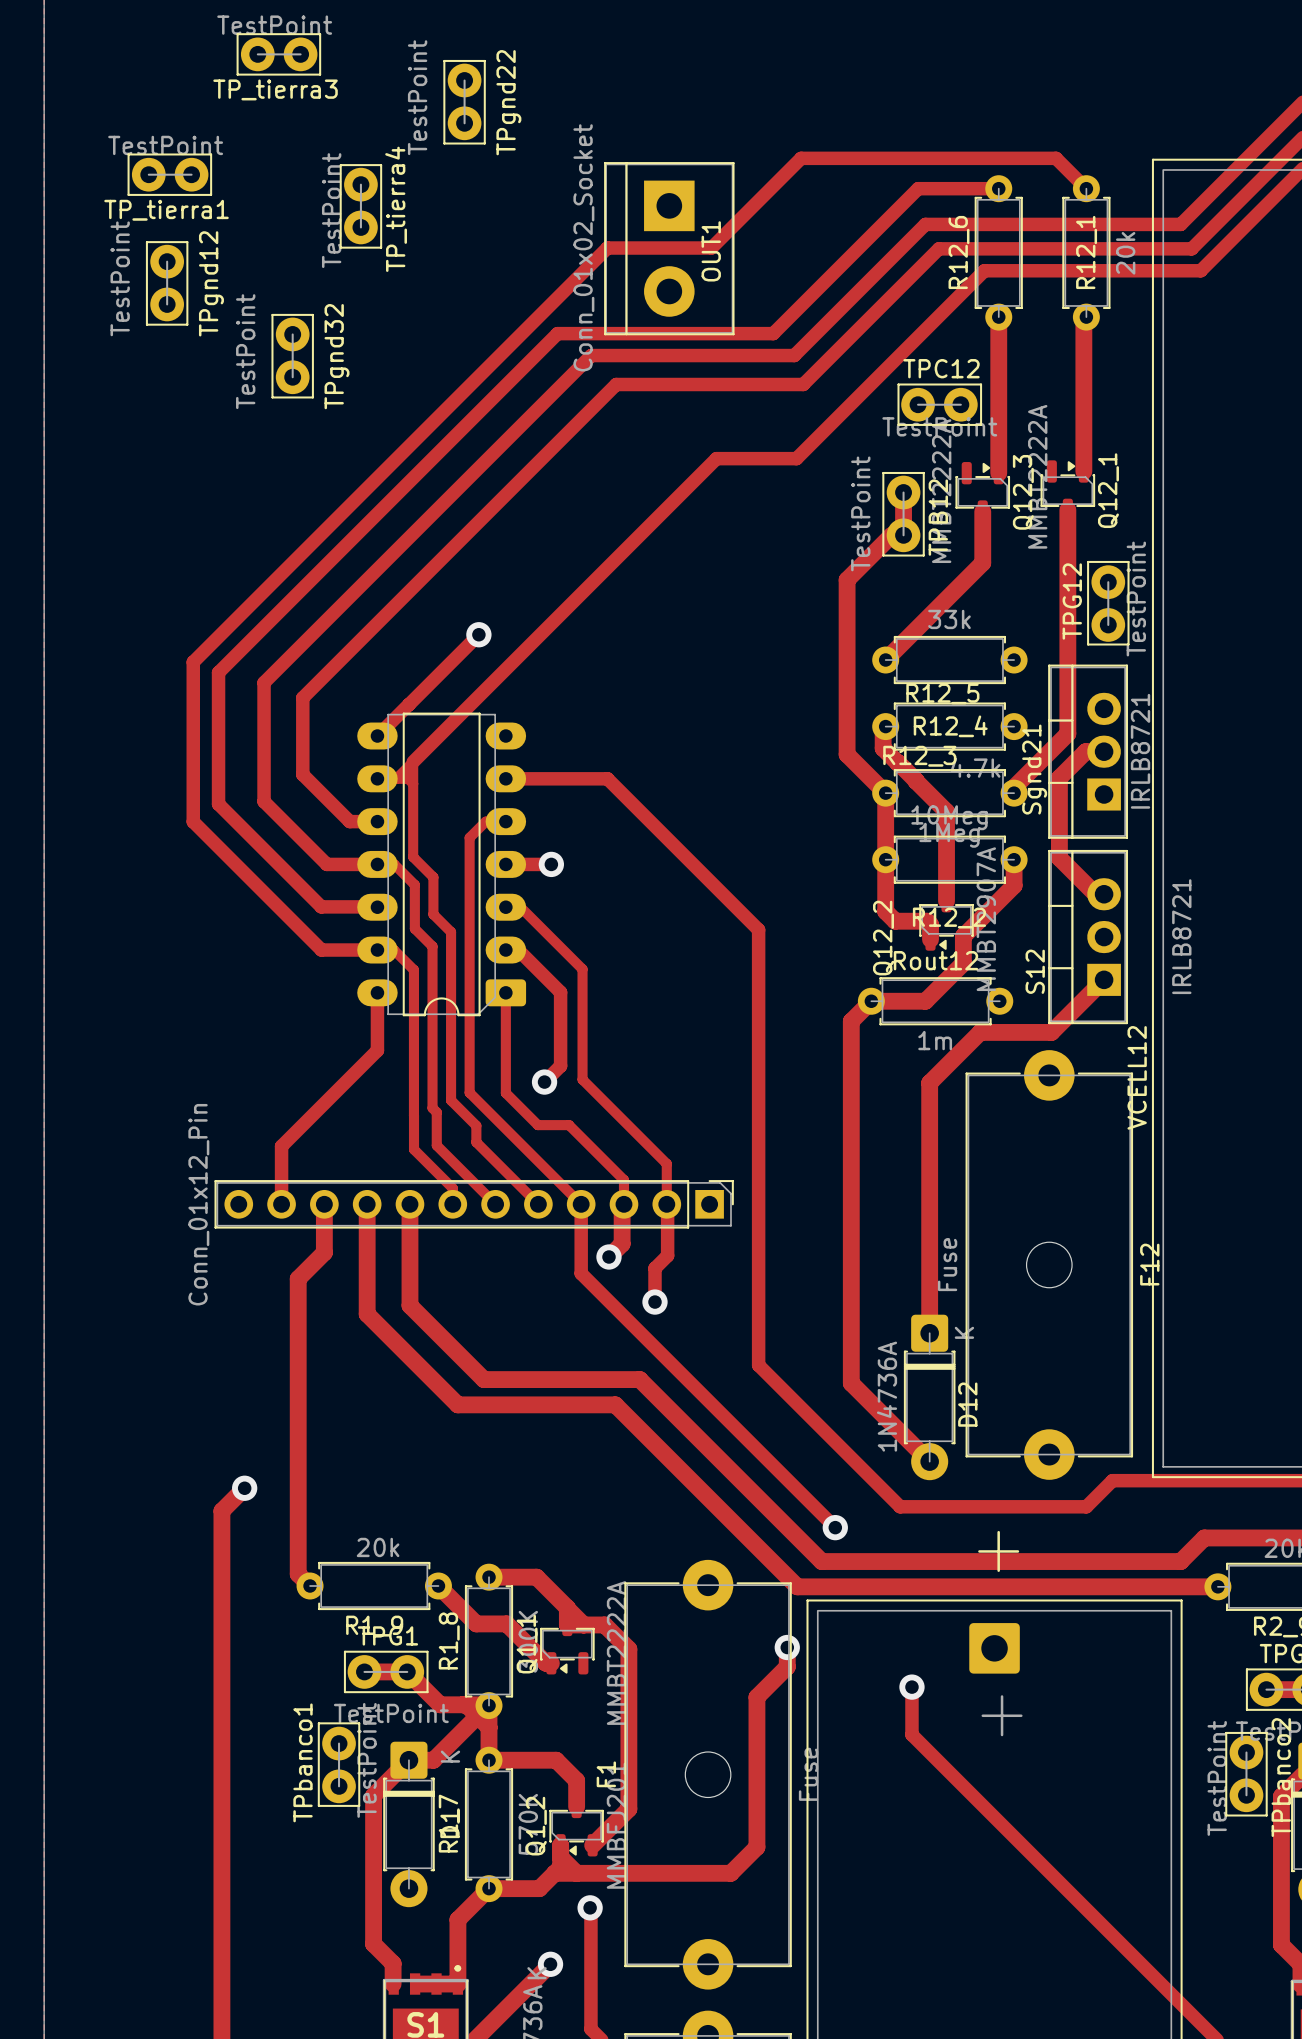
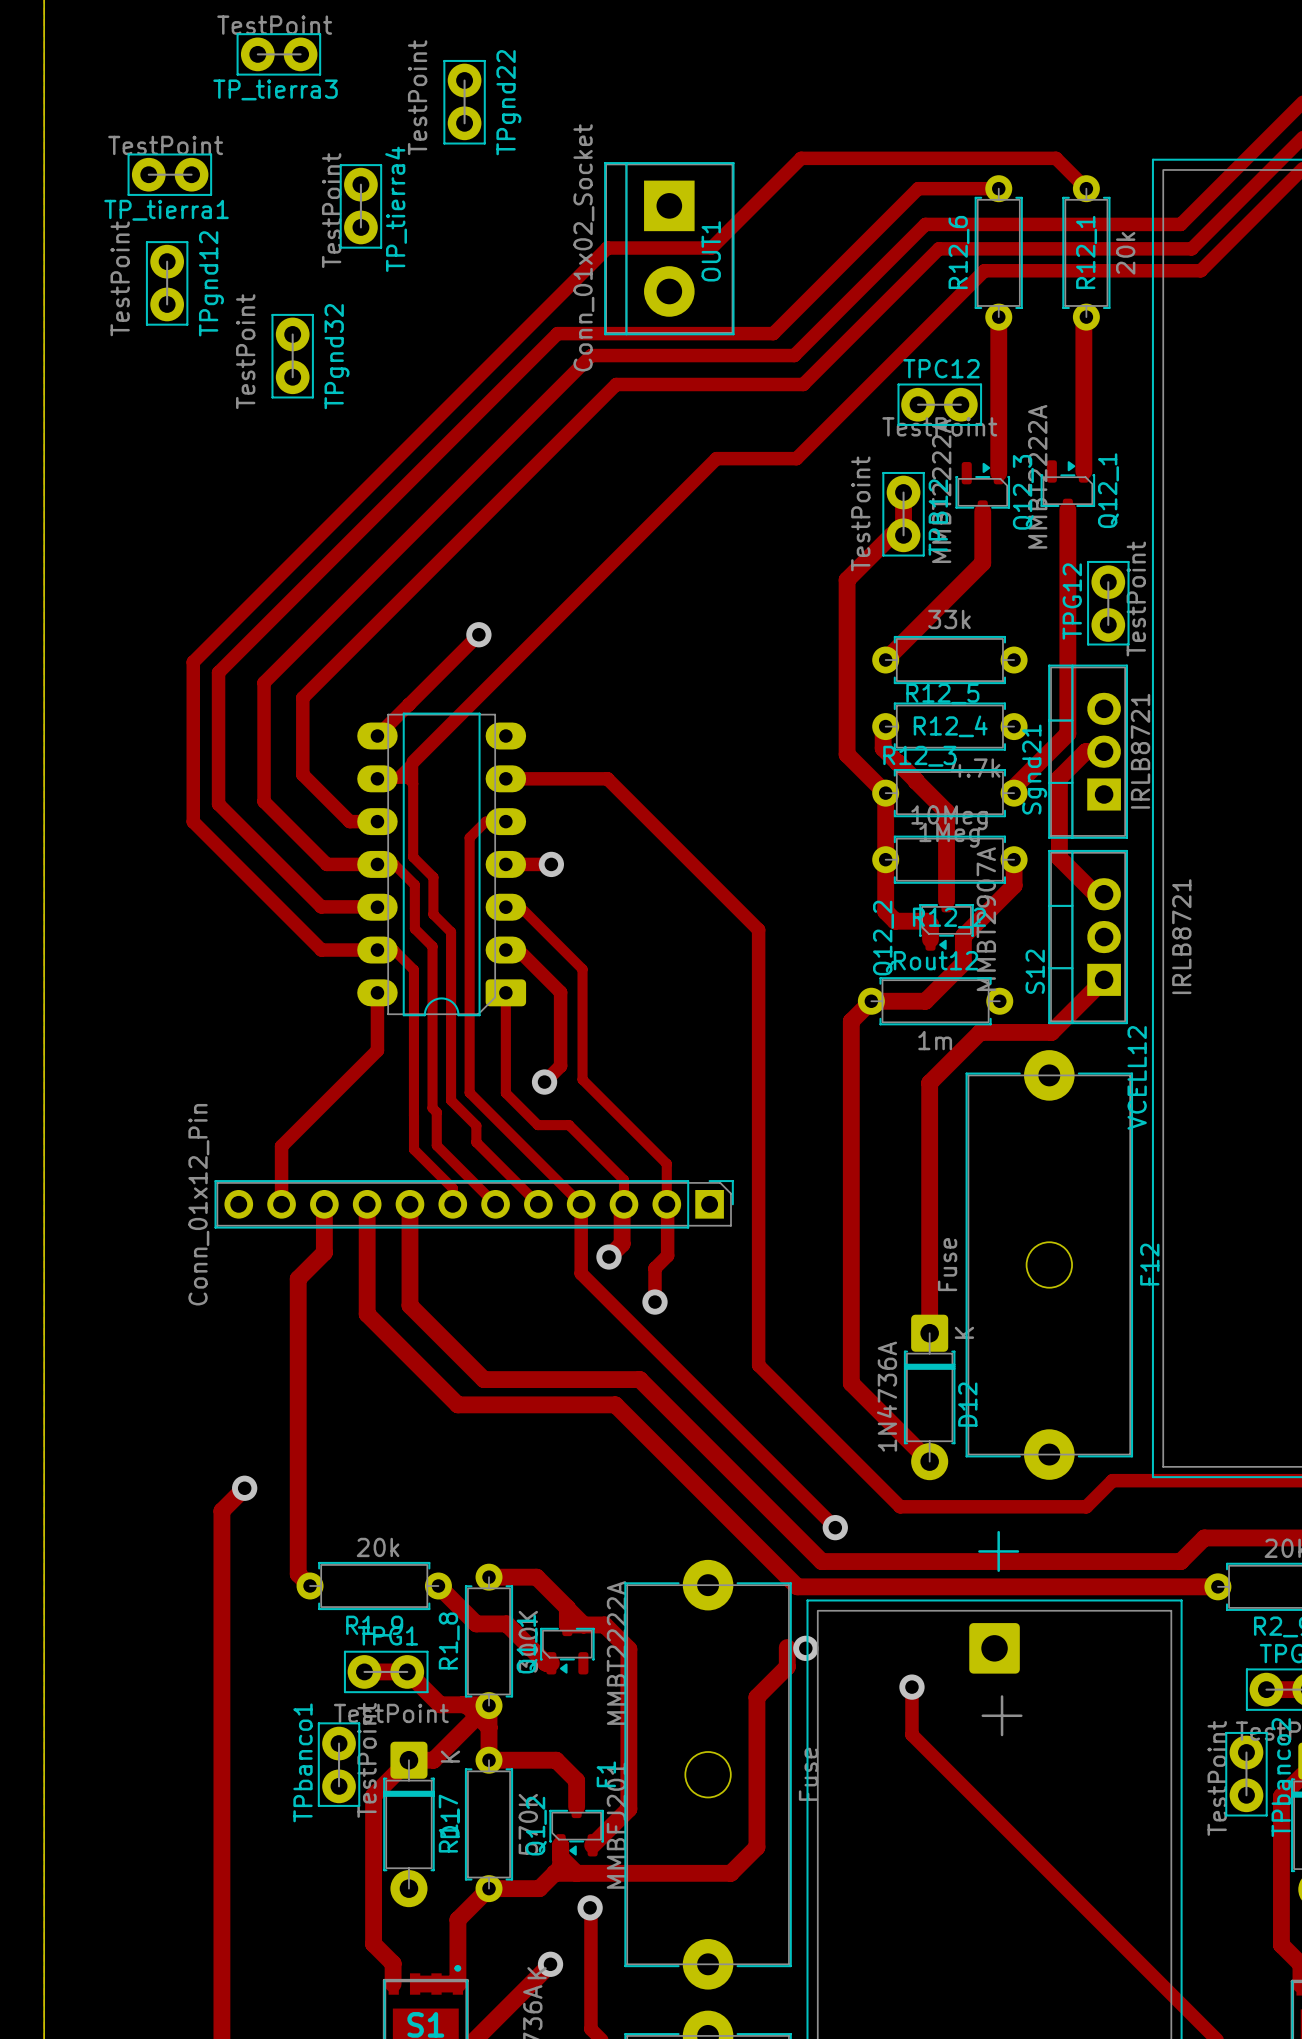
via position: (787, 1647) -> (805, 1648)

